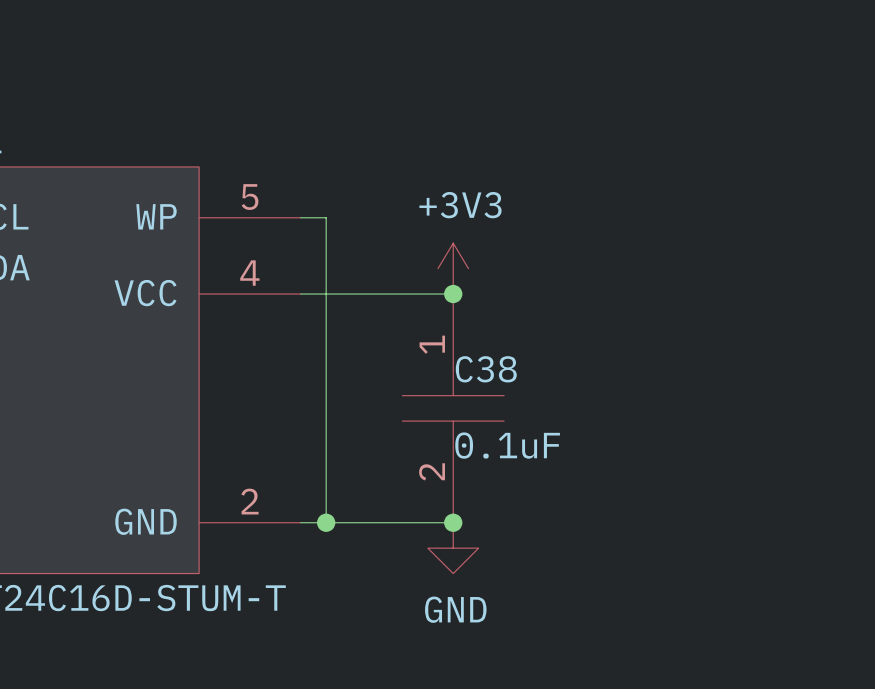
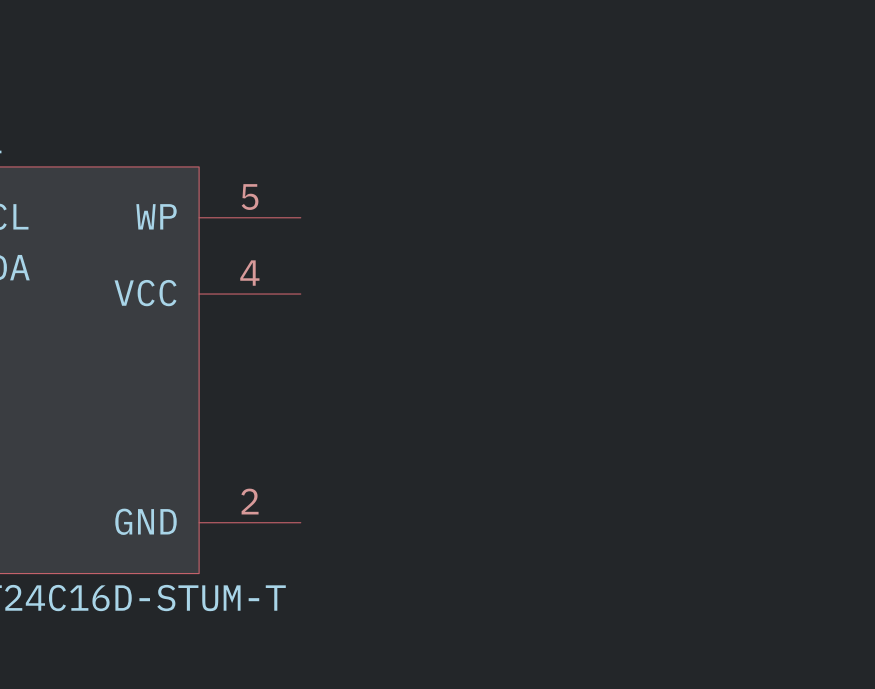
wire: (300, 217) (326, 217) (326, 522) -> none
power symbol: +3V3 (453, 268) -> none
wire: (300, 294) (453, 294) -> none
junction: (453, 294) -> none
C38: (453, 408) -> none
wire: (300, 522) (453, 522) -> none
junction: (326, 522) -> none
junction: (453, 522) -> none
power symbol: GND (453, 548) -> none

